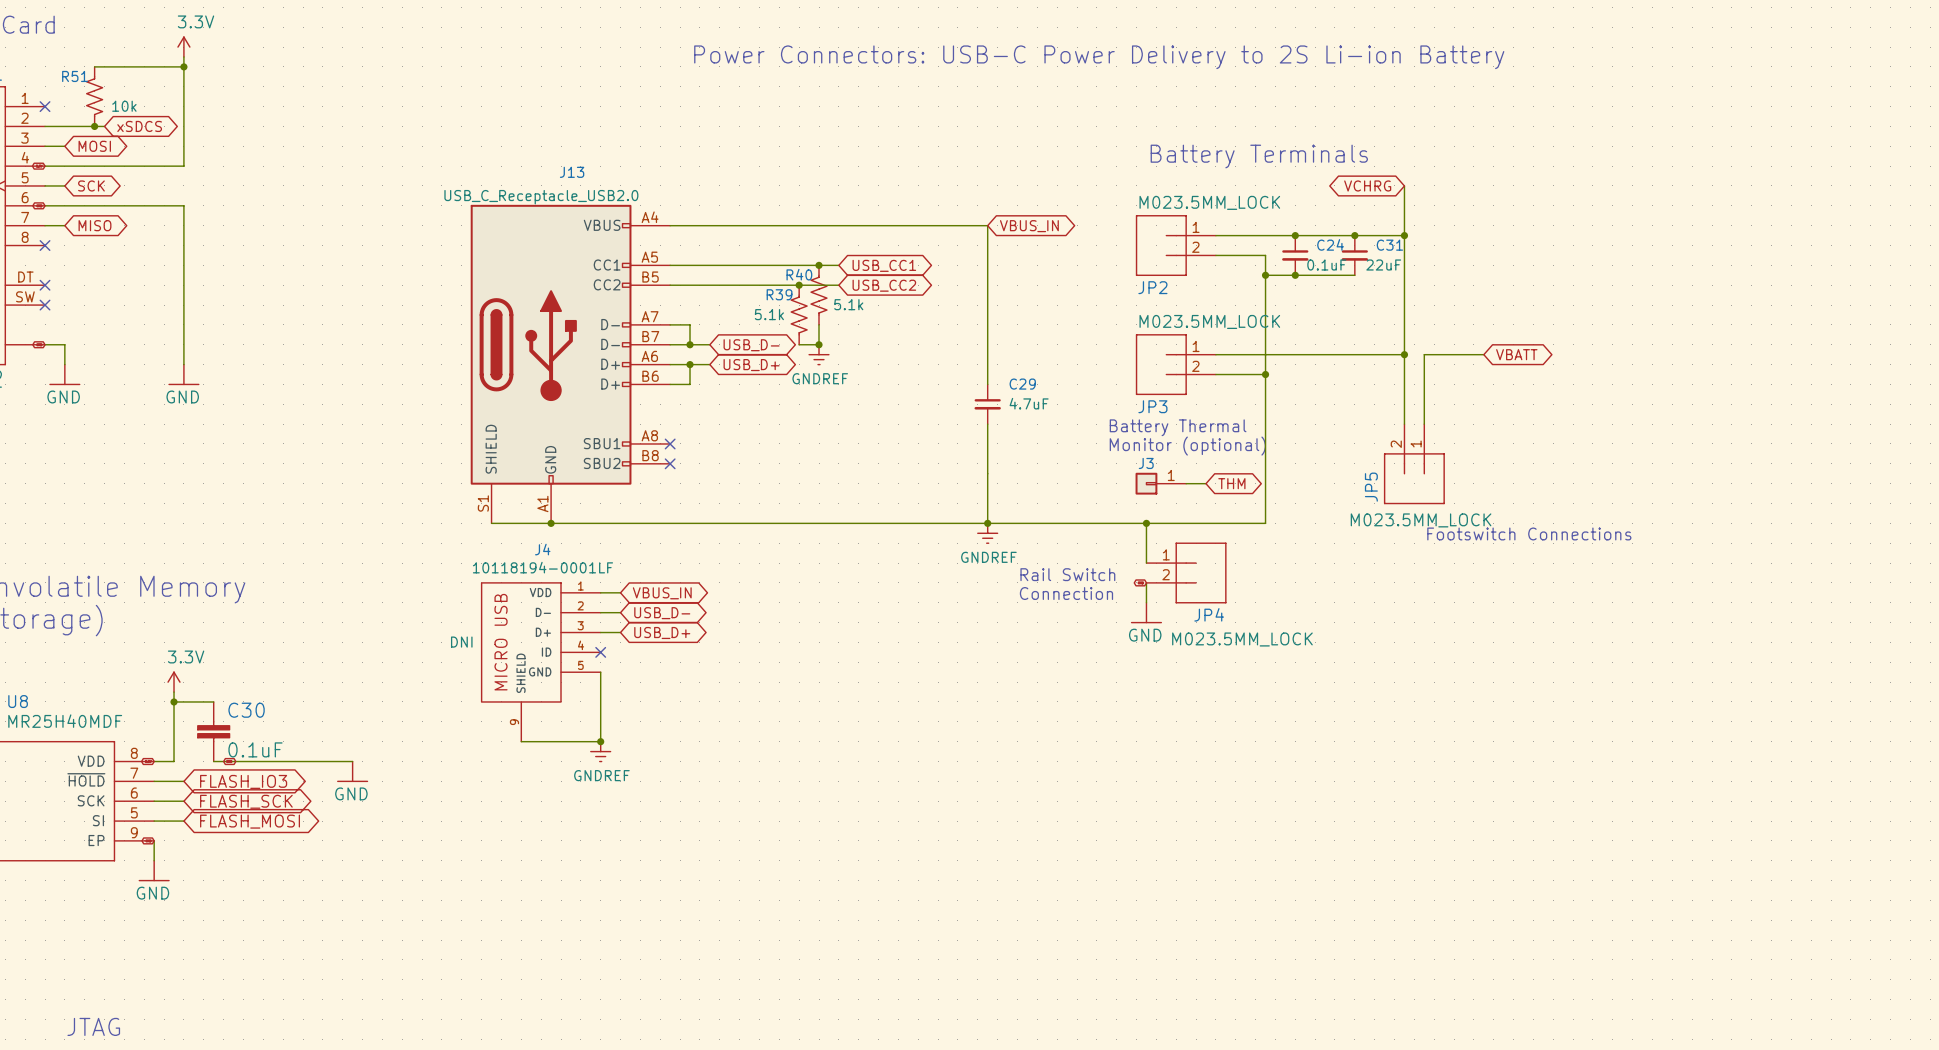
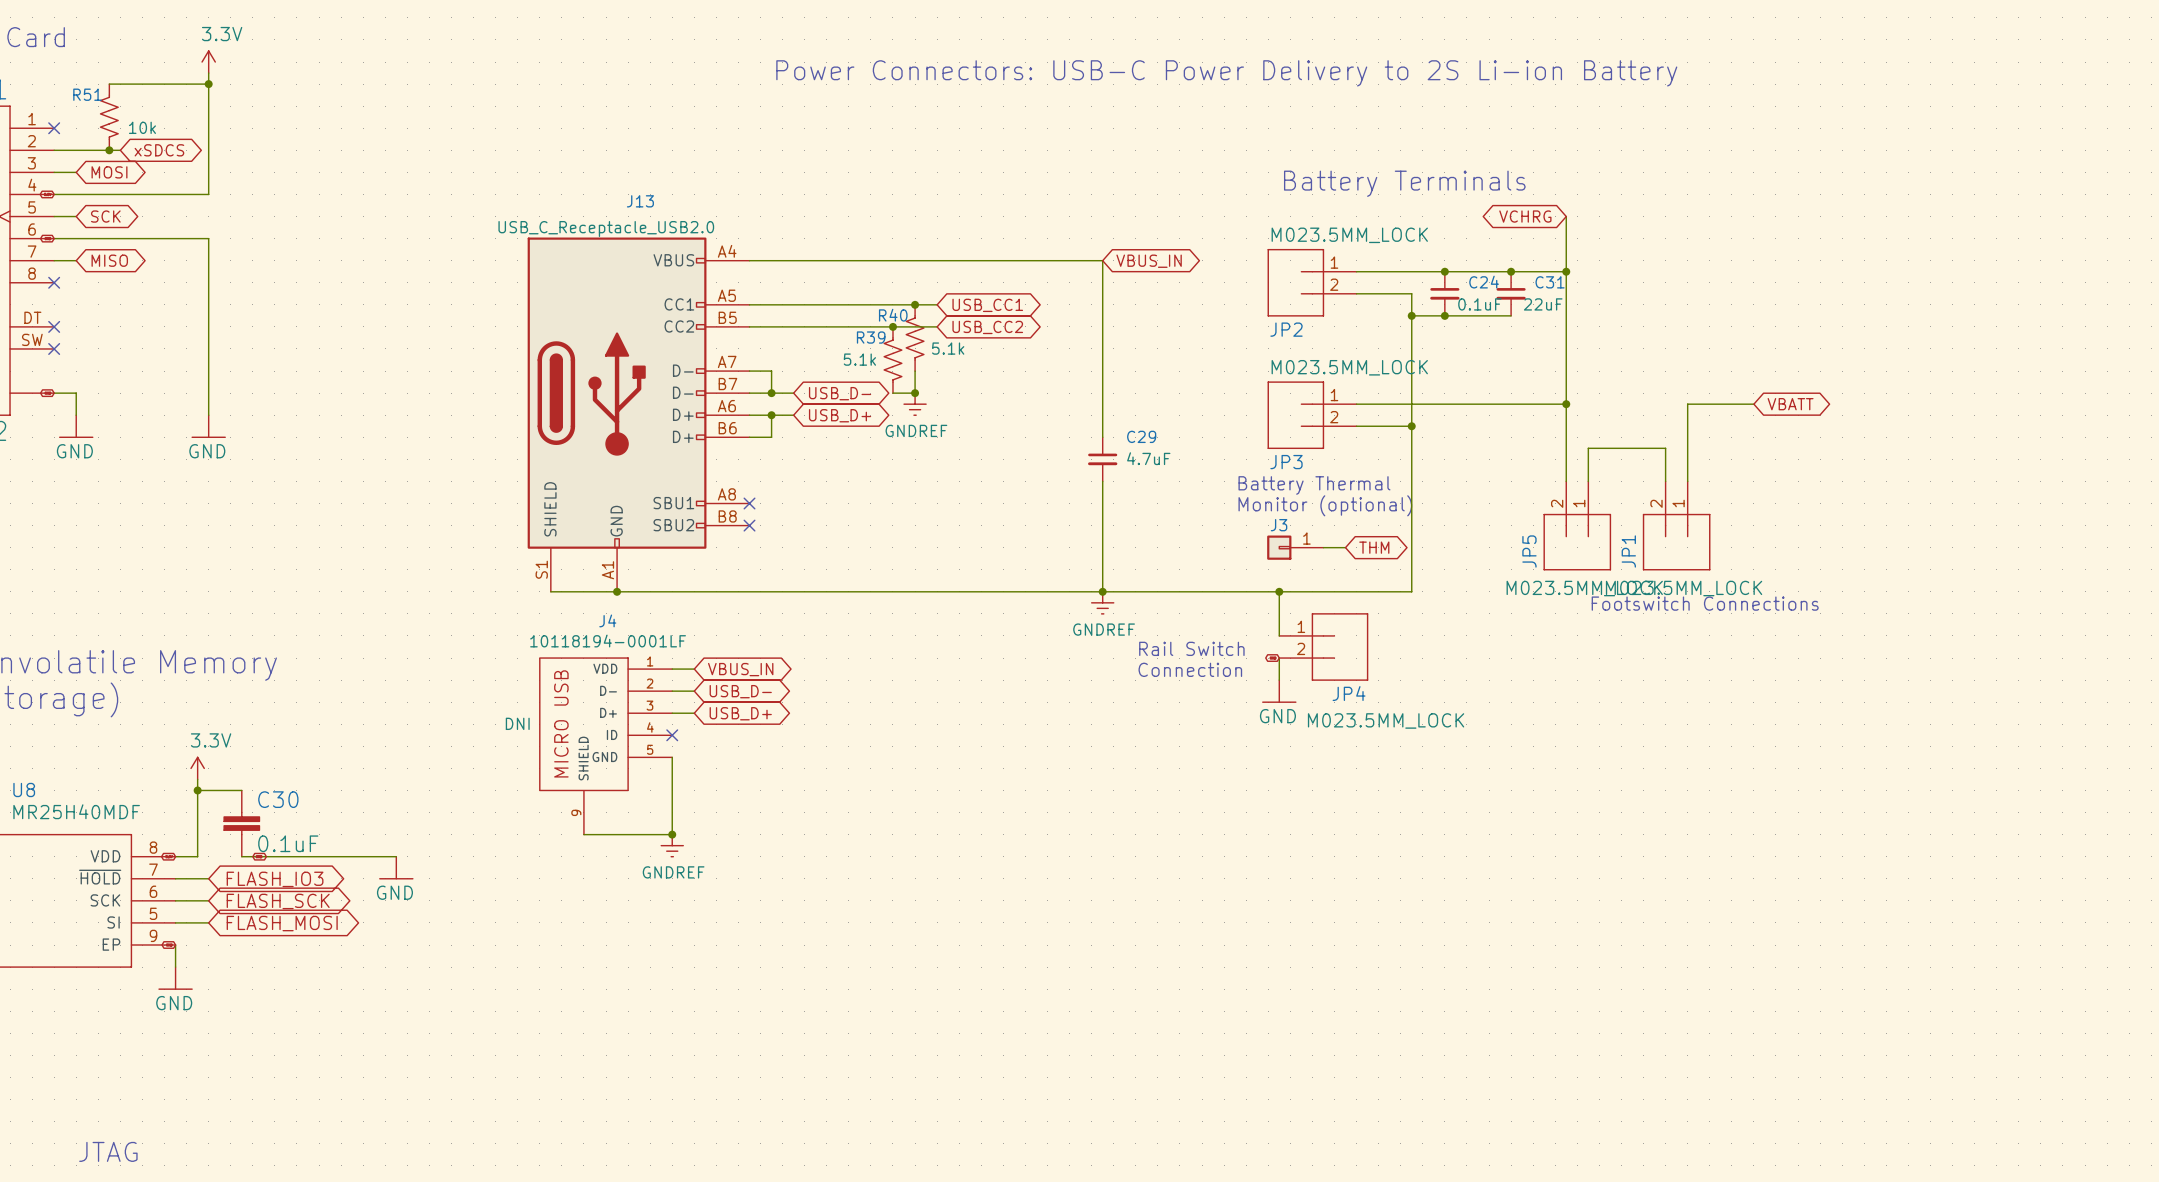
wire: (1483, 354) (1424, 354) (1424, 394) -> (1665, 481) (1665, 448) (1588, 448)
global label position: VBATT (1516, 354) -> VBATT (1790, 404)
wire: none -> (1753, 404) (1687, 404) (1687, 481)
JP1: none -> M023.5MM_LOCK (1676, 525)

